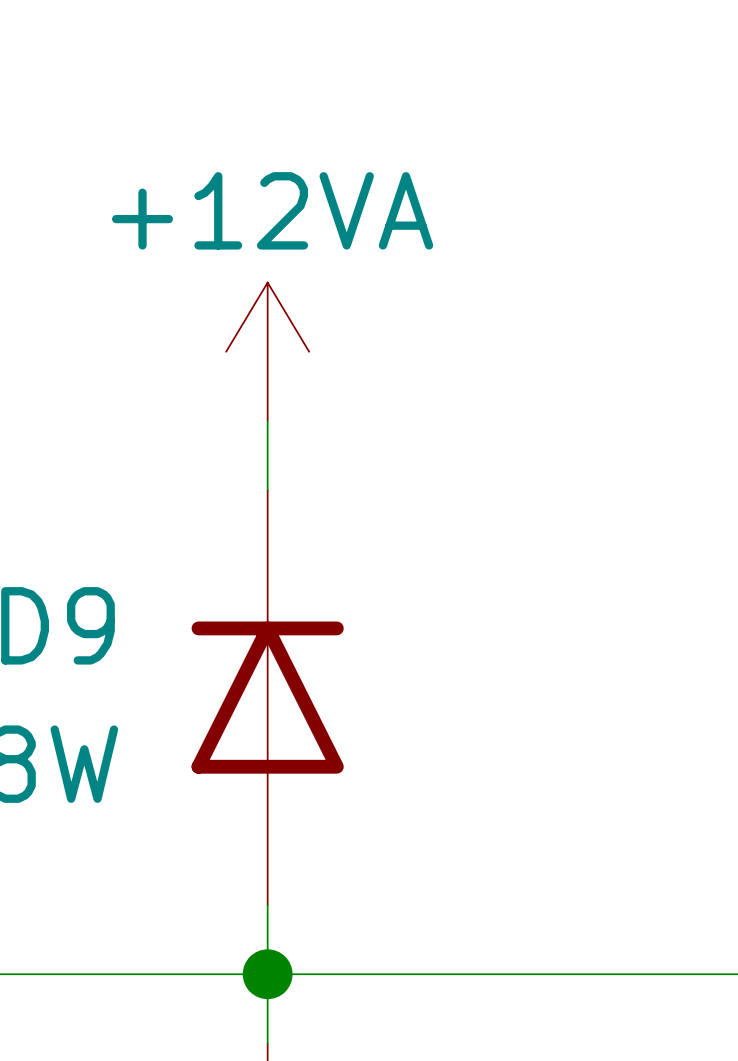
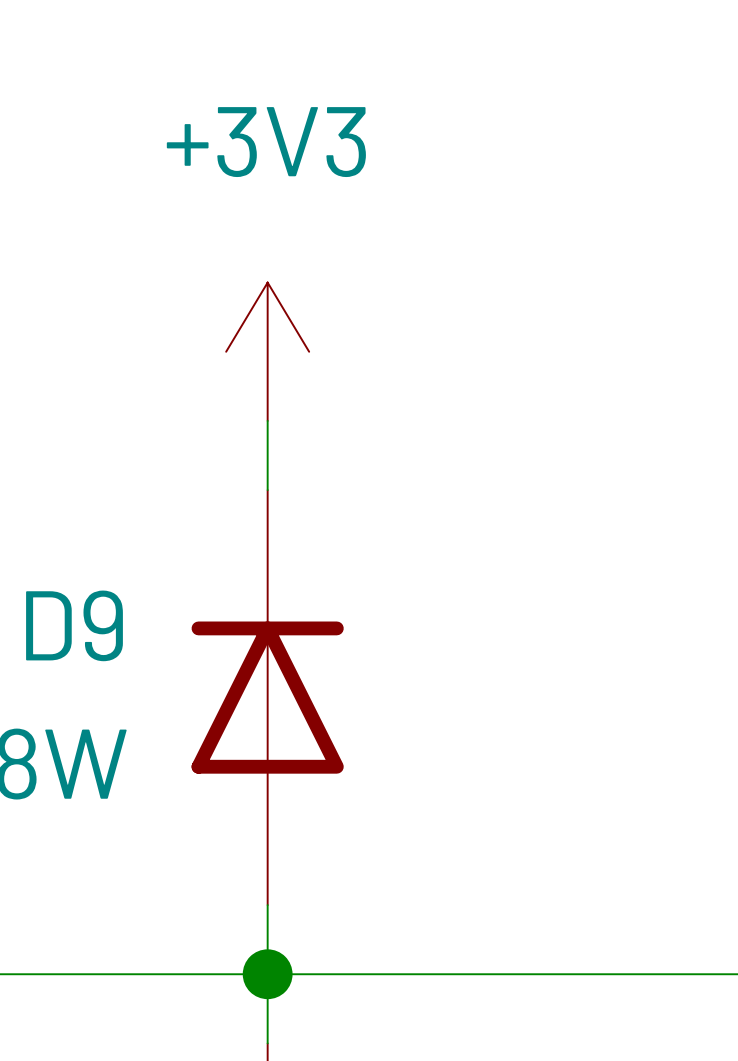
power symbol: +12VA (267, 351) -> +3V3 (267, 351)

